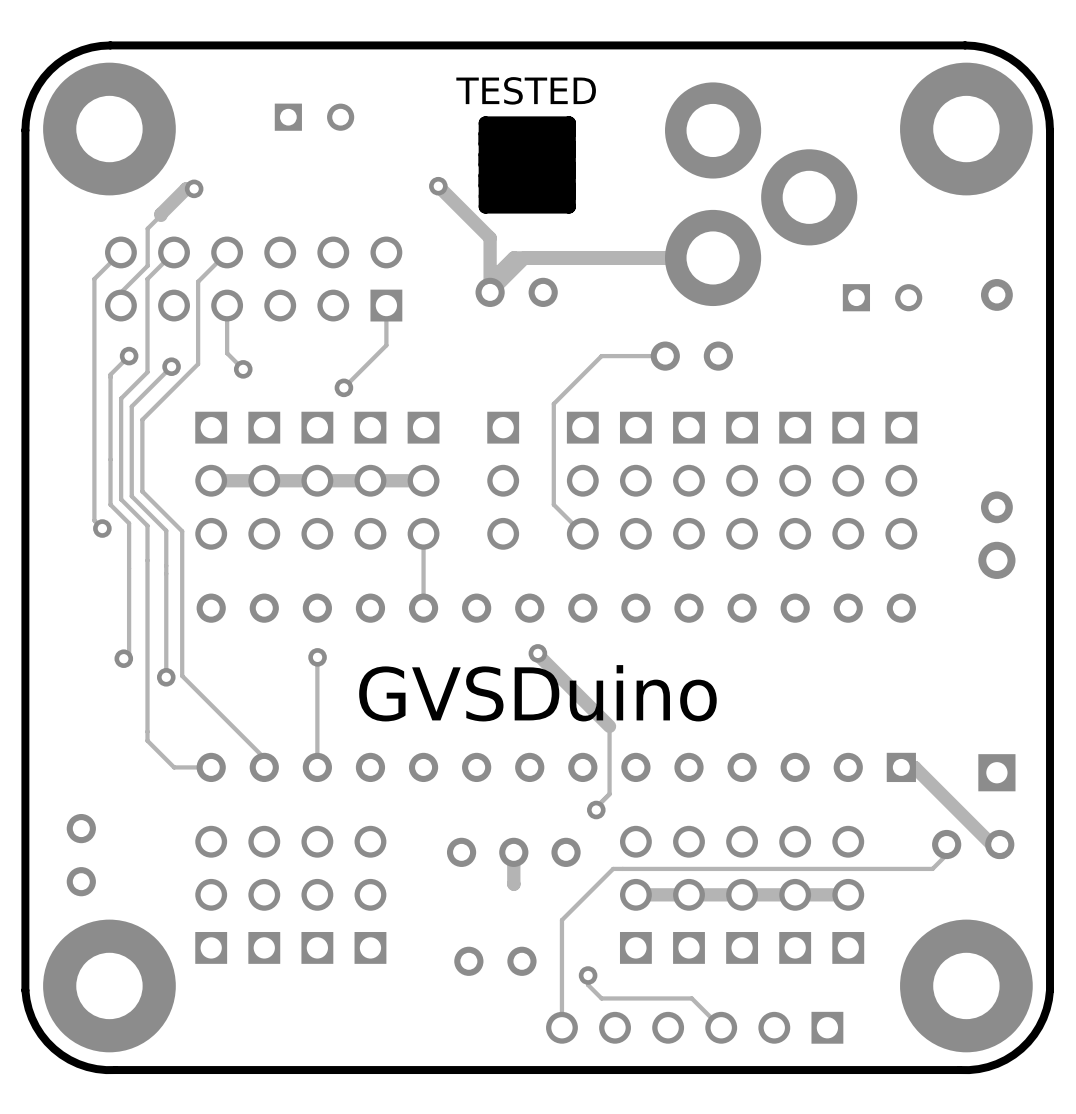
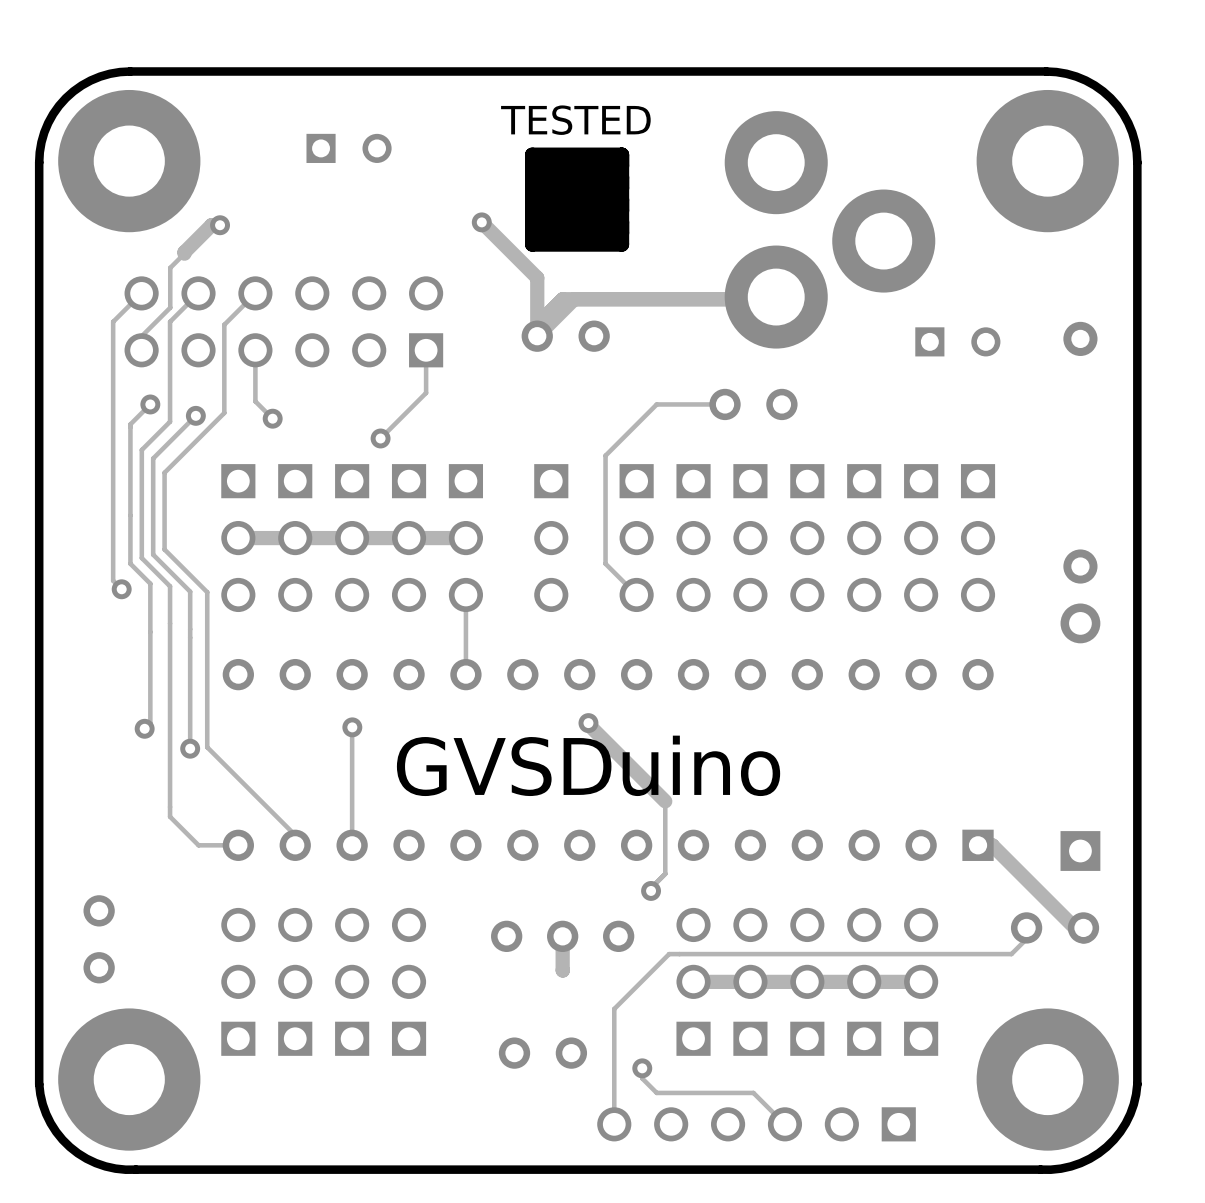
part footprint: [665, 82, 858, 307] -> [724, 111, 936, 349]

